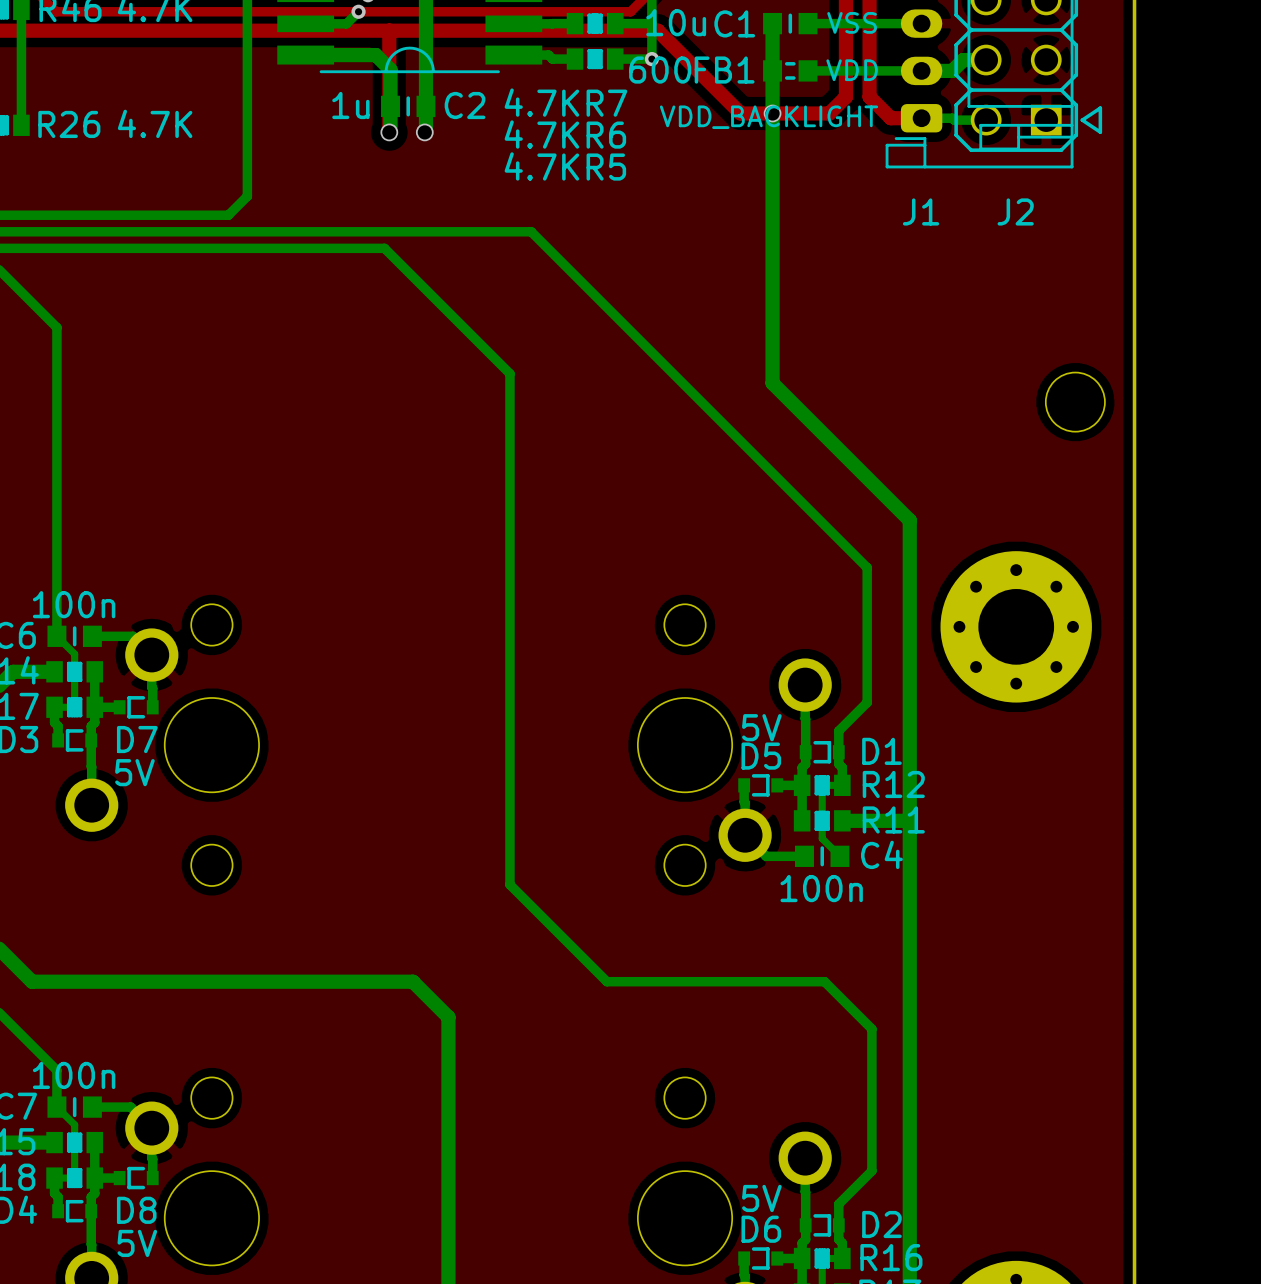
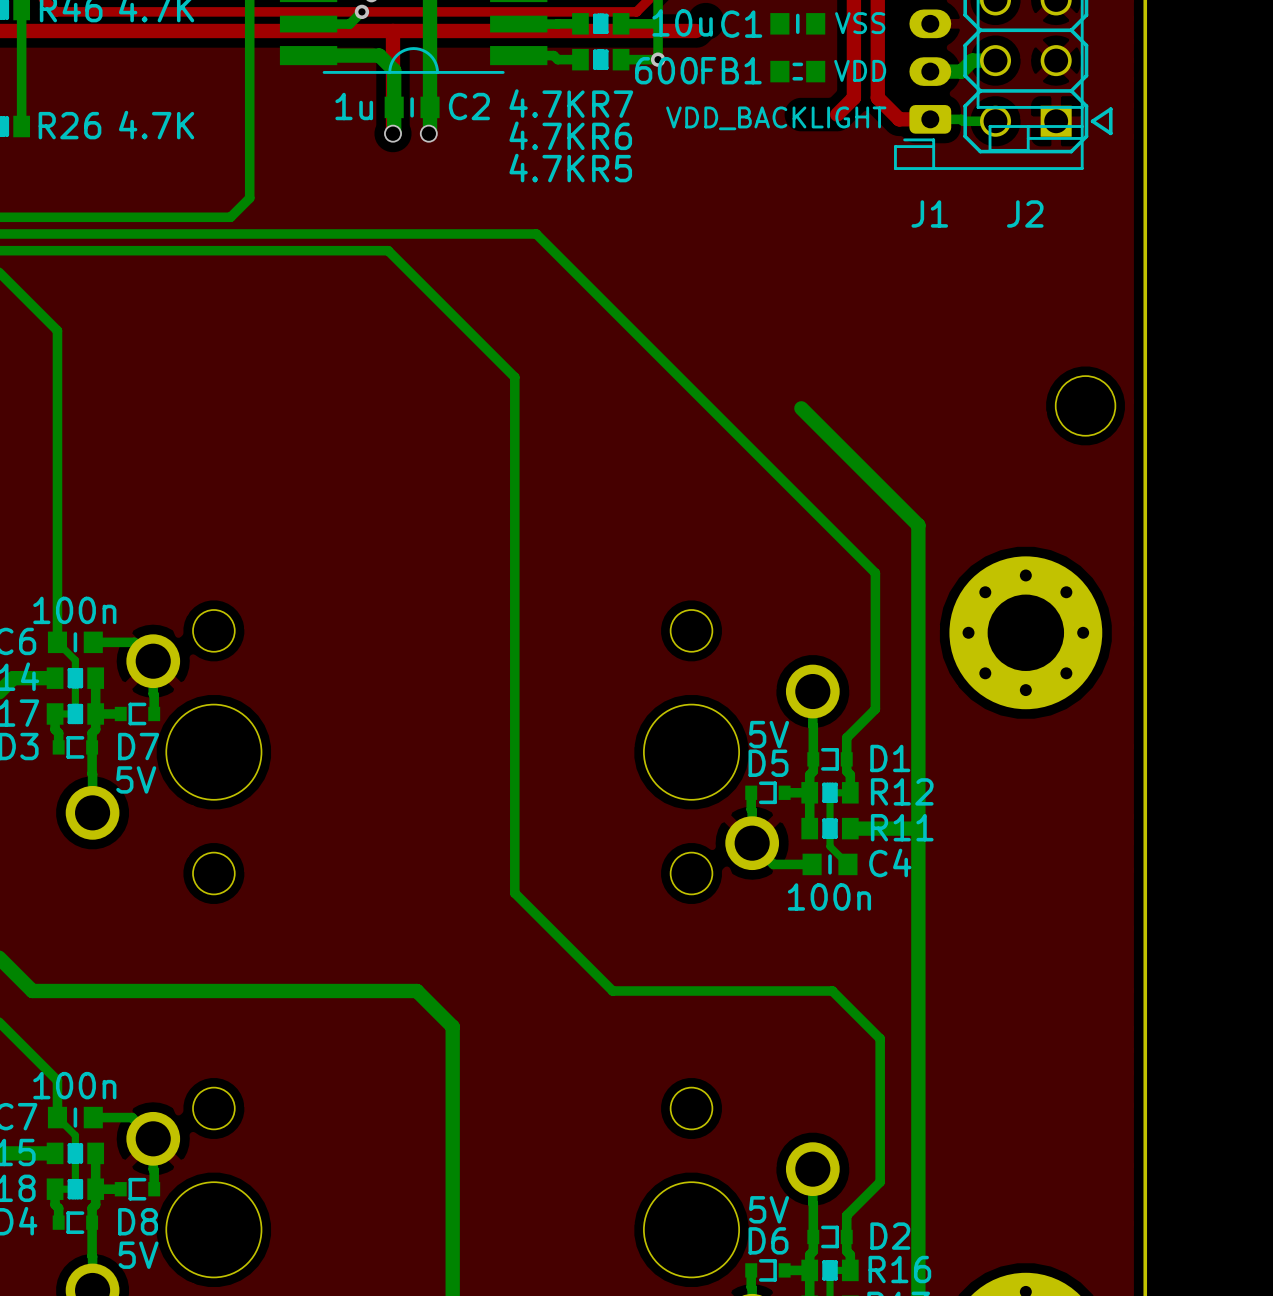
bottom track: (772, 23) (772, 383) (793, 404) -> none
bottom track: (921, 23) (808, 23) -> none
top track: (657, 30) (740, 113) (829, 113) -> (664, 30) (696, 30)
bottom track: (921, 70) (808, 70) -> none
via: (772, 113) -> none

